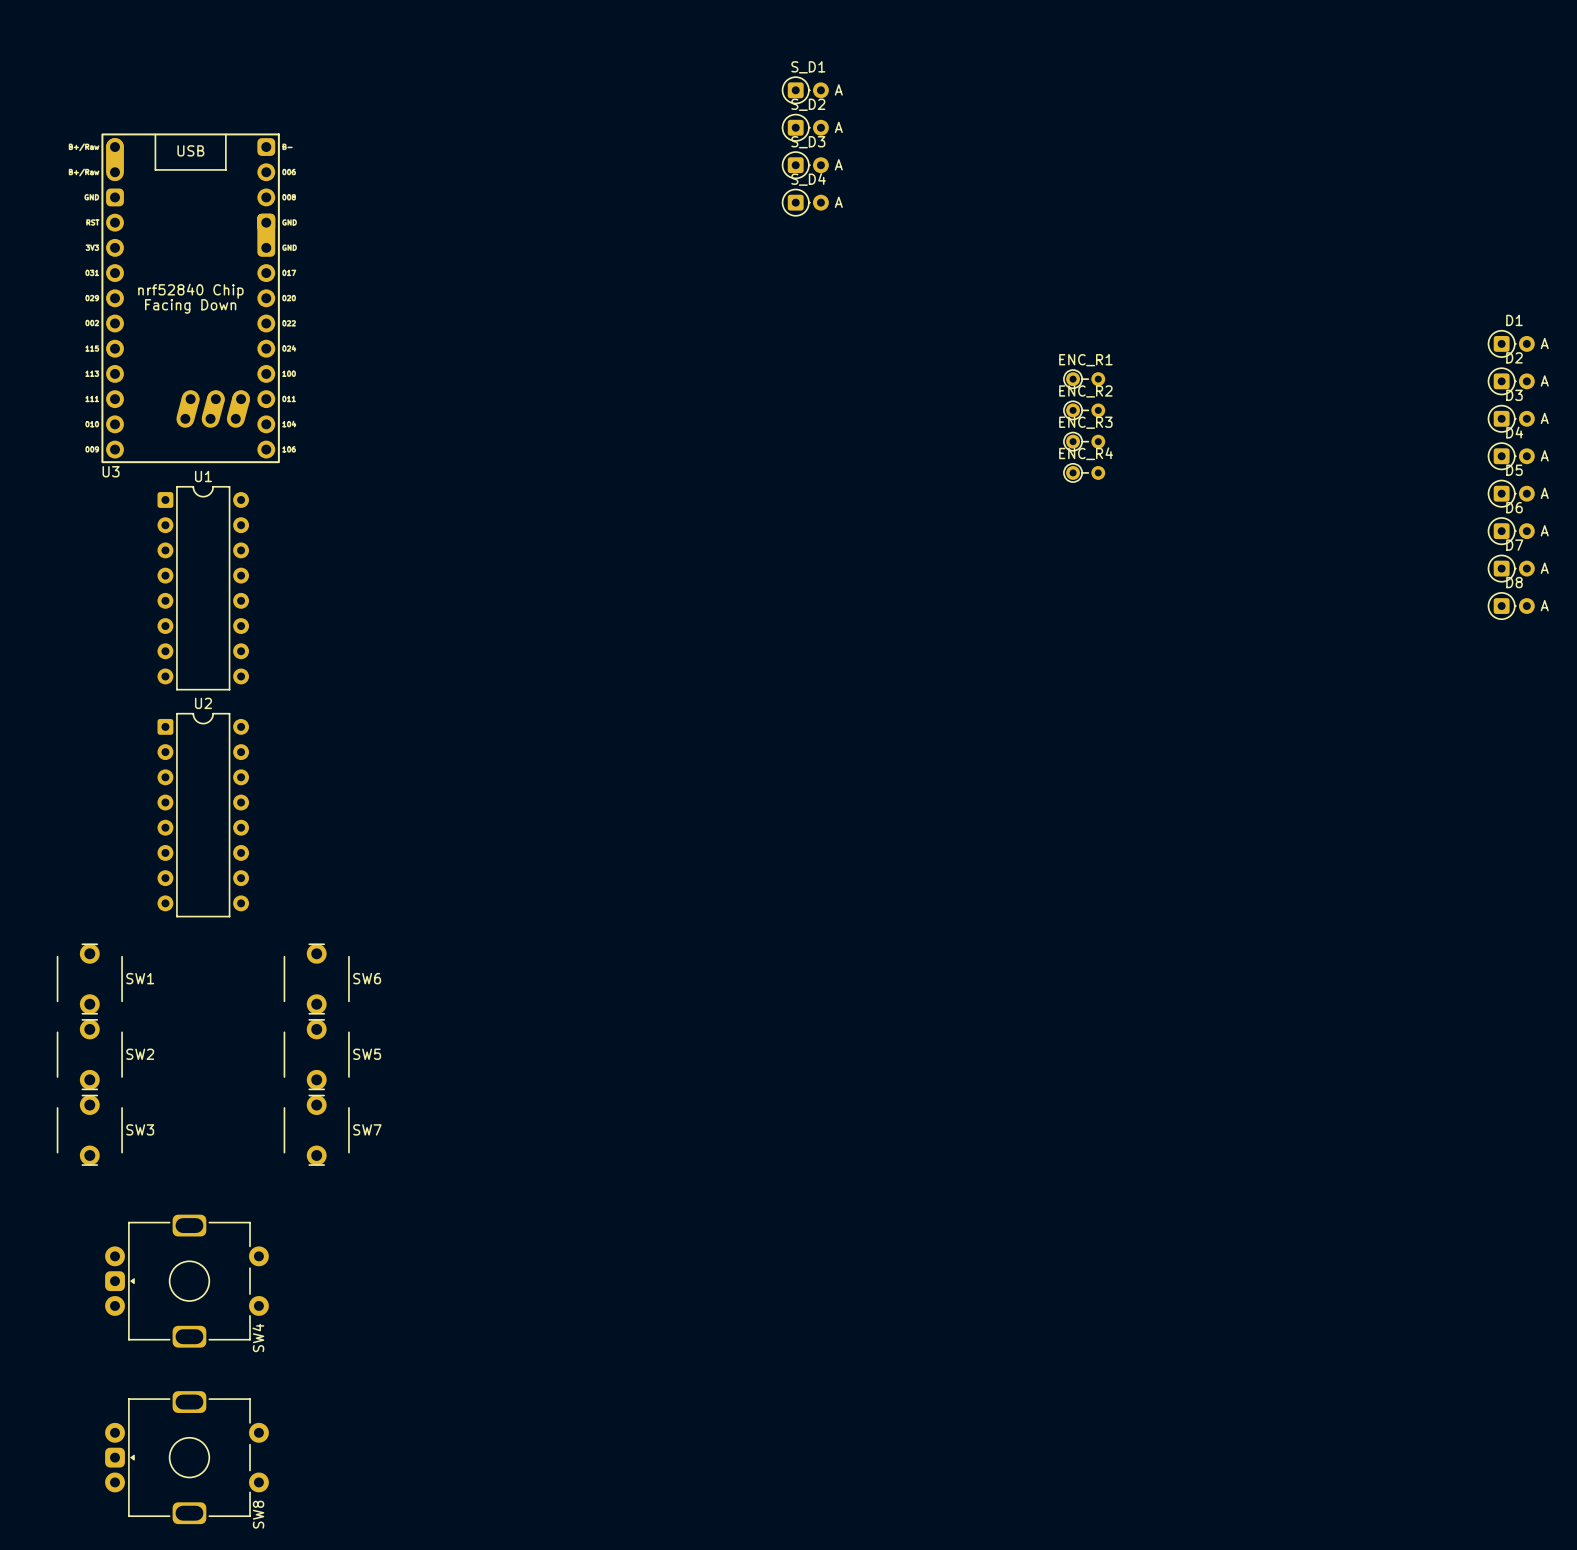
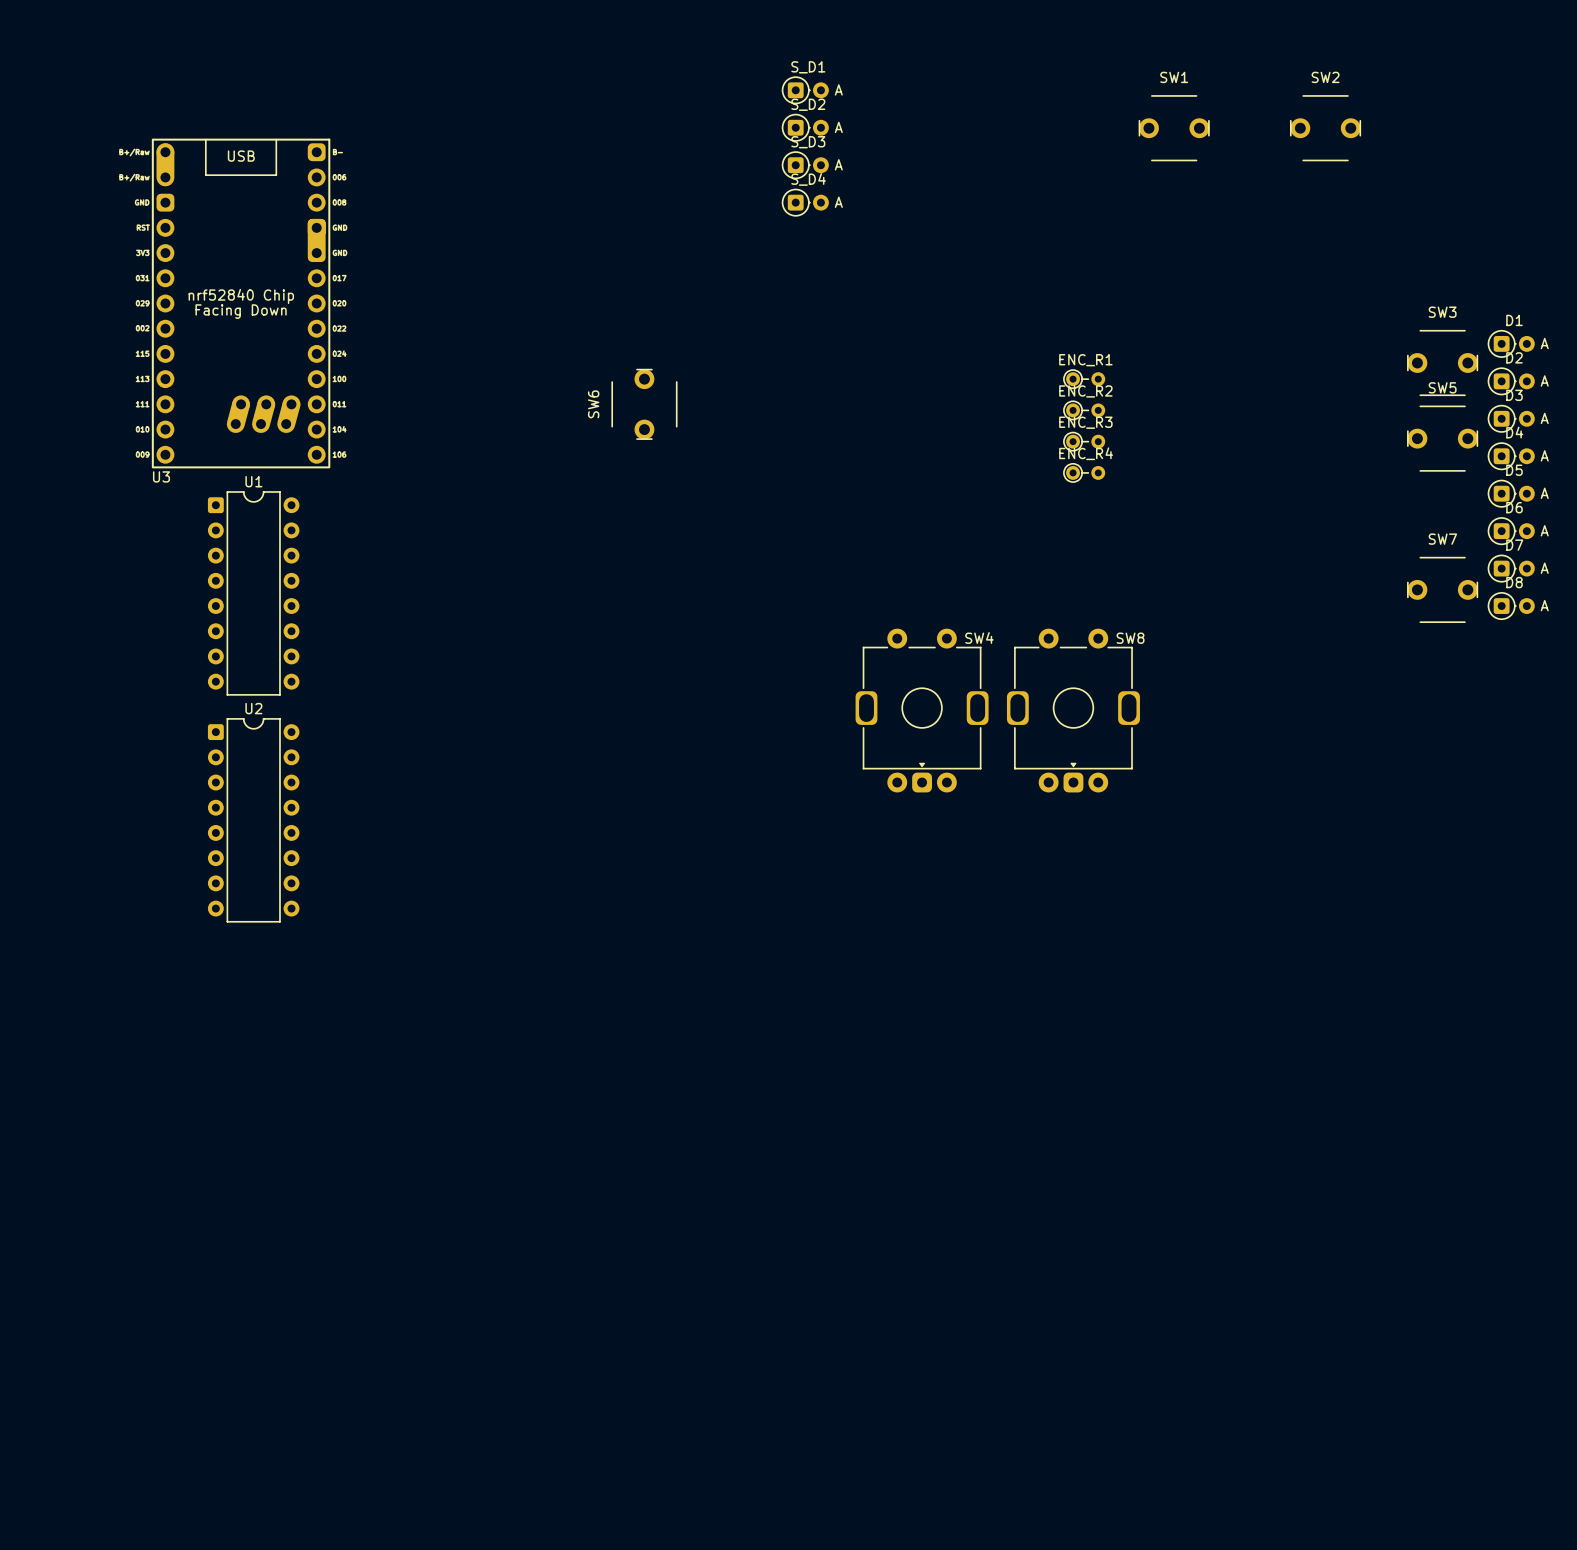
U3 position: (190, 298) -> (241, 303)
U1 position: (203, 588) -> (253, 593)
U2 position: (203, 815) -> (253, 820)
SW1 name position: SW1 (140, 978) -> SW1 (1174, 77)
SW6 name rotation: 0° (367, 978) -> 90° counterclockwise (593, 404)
SW6 name position: SW6 (367, 978) -> SW6 (593, 404)
SW1 rotation: 0° (89, 979) -> 90° clockwise (1174, 128)
SW1 position: (89, 979) -> (1174, 128)
SW6 position: (316, 979) -> (644, 404)
SW2 rotation: 0° (89, 1054) -> 90° clockwise (1325, 128)
SW2 position: (89, 1054) -> (1325, 128)
SW2 name position: SW2 (140, 1054) -> SW2 (1325, 77)
SW5 rotation: 0° (316, 1054) -> 90° clockwise (1442, 438)
SW5 position: (316, 1054) -> (1442, 438)
SW5 name position: SW5 (367, 1054) -> SW5 (1442, 387)
SW3 name position: SW3 (140, 1129) -> SW3 (1442, 312)
SW7 name position: SW7 (367, 1129) -> SW7 (1442, 539)
SW3 rotation: 0° (89, 1130) -> 90° clockwise (1442, 363)
SW3 position: (89, 1130) -> (1442, 363)
SW7 rotation: 0° (316, 1130) -> 90° clockwise (1442, 589)
SW7 position: (316, 1130) -> (1442, 589)
SW4 rotation: 0° (186, 1281) -> 90° counterclockwise (922, 710)
SW4 position: (186, 1281) -> (922, 710)
SW8 rotation: 0° (186, 1457) -> 90° counterclockwise (1073, 710)
SW8 position: (186, 1457) -> (1073, 710)

